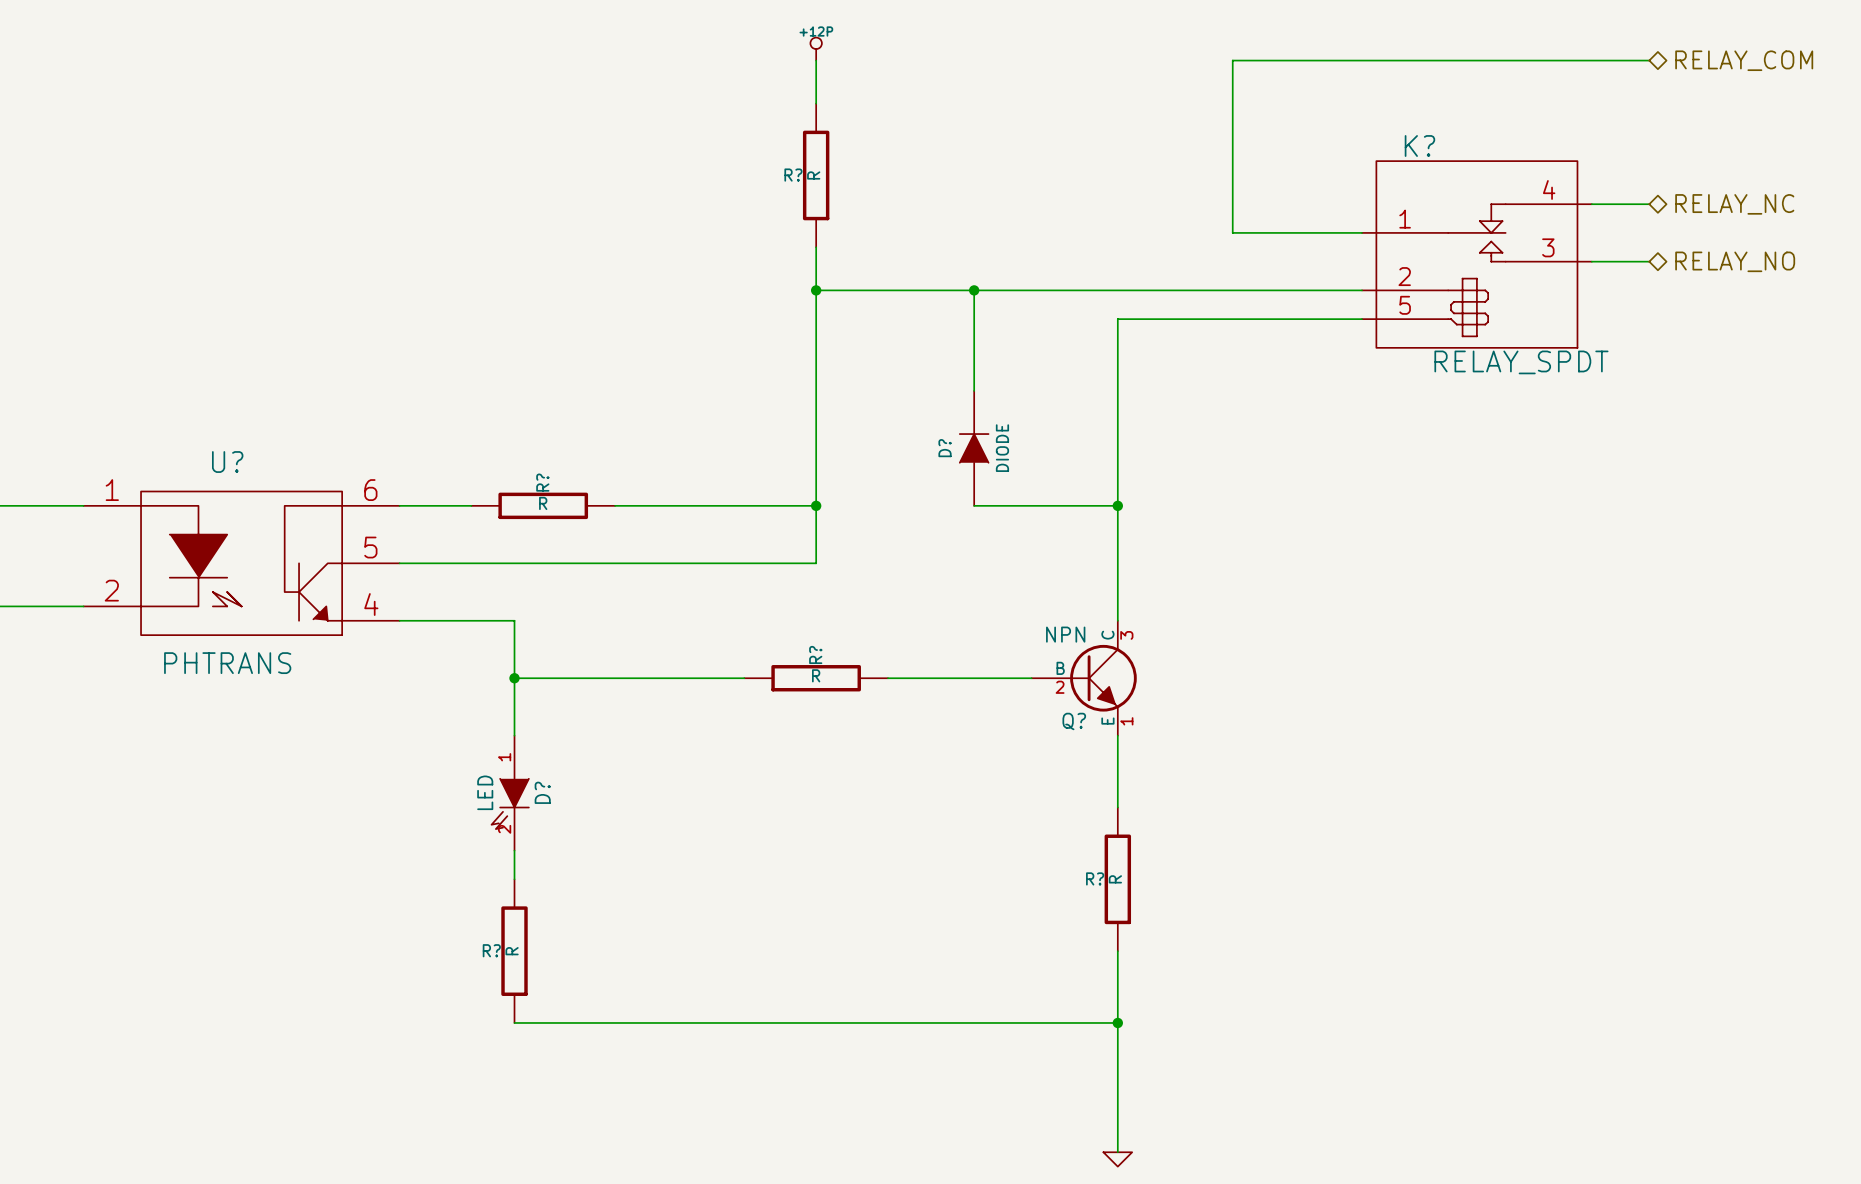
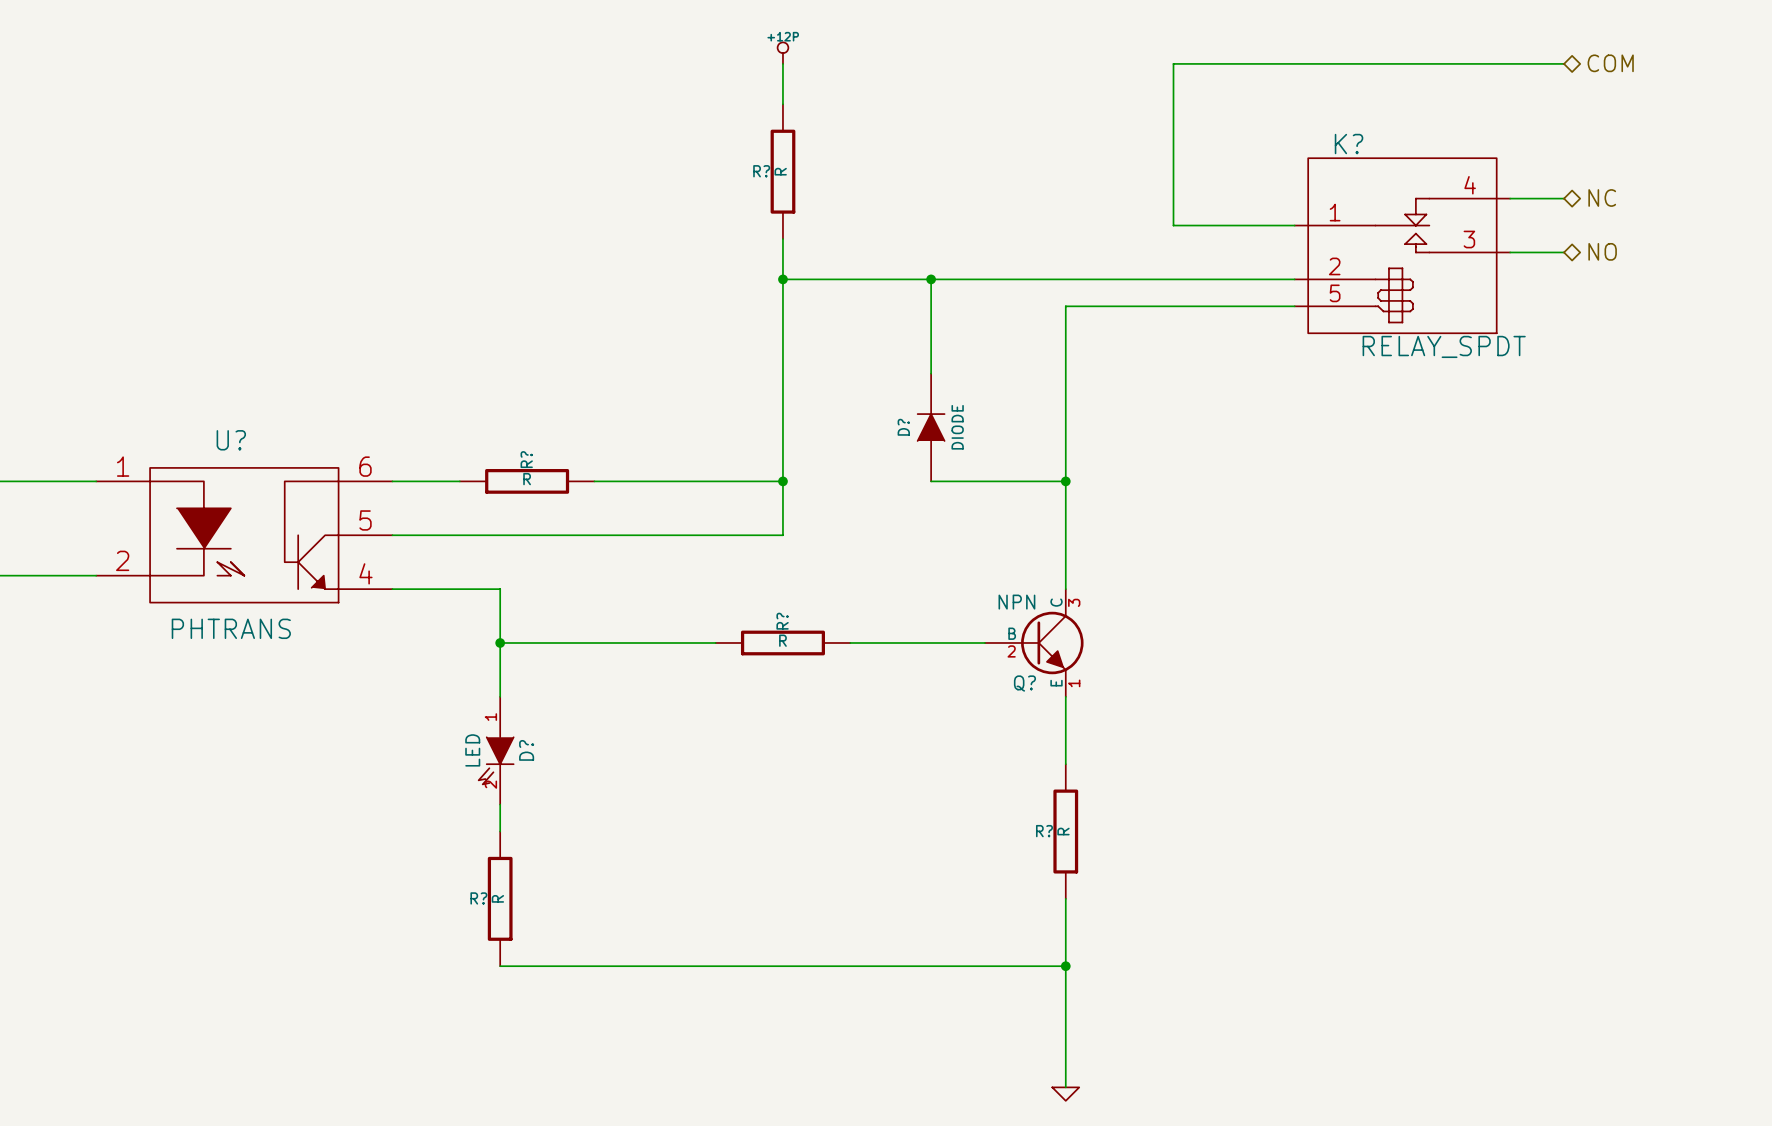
hierarchical label: RELAY_COM (1744, 60) -> COM (1610, 63)
hierarchical label: RELAY_NC (1734, 204) -> NC (1602, 197)
hierarchical label: RELAY_NO (1735, 261) -> NO (1602, 251)

